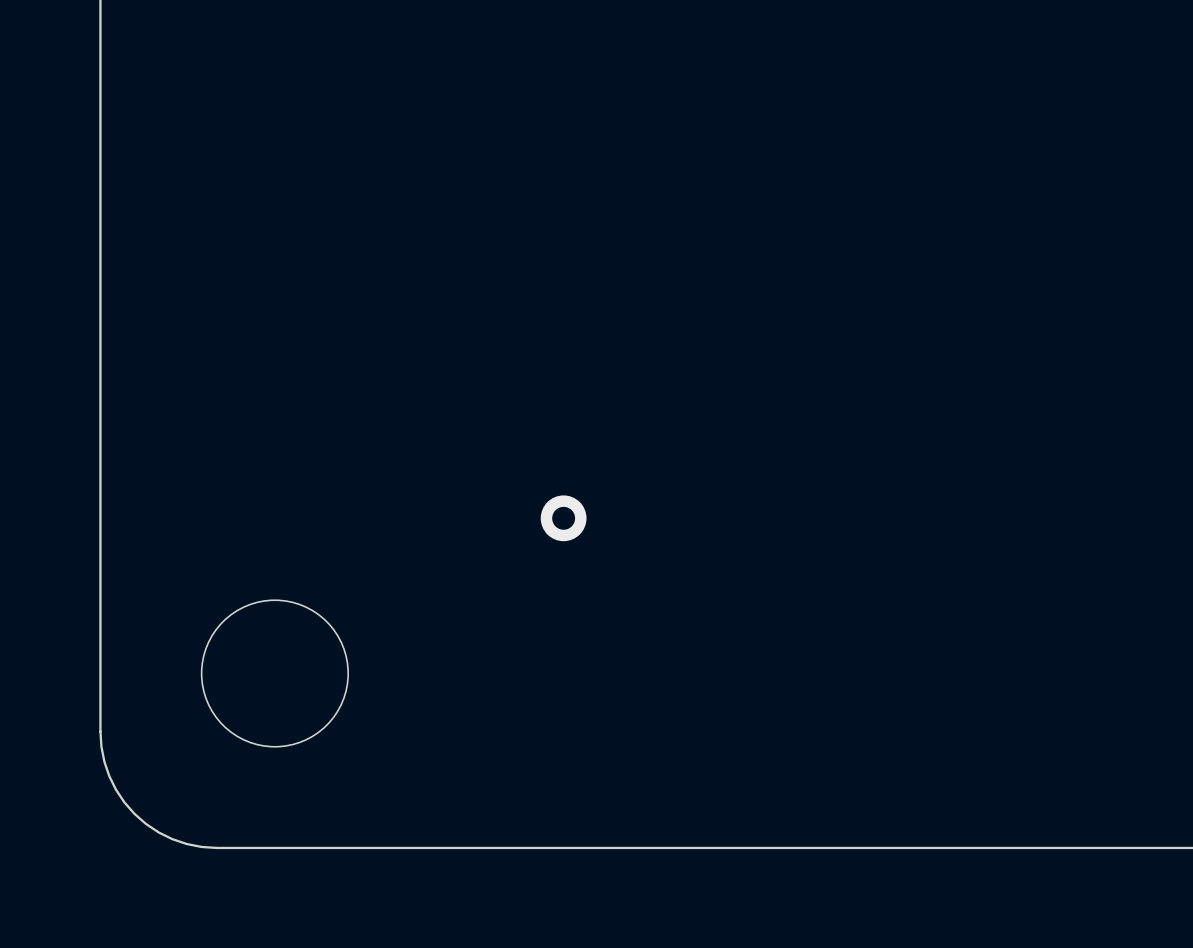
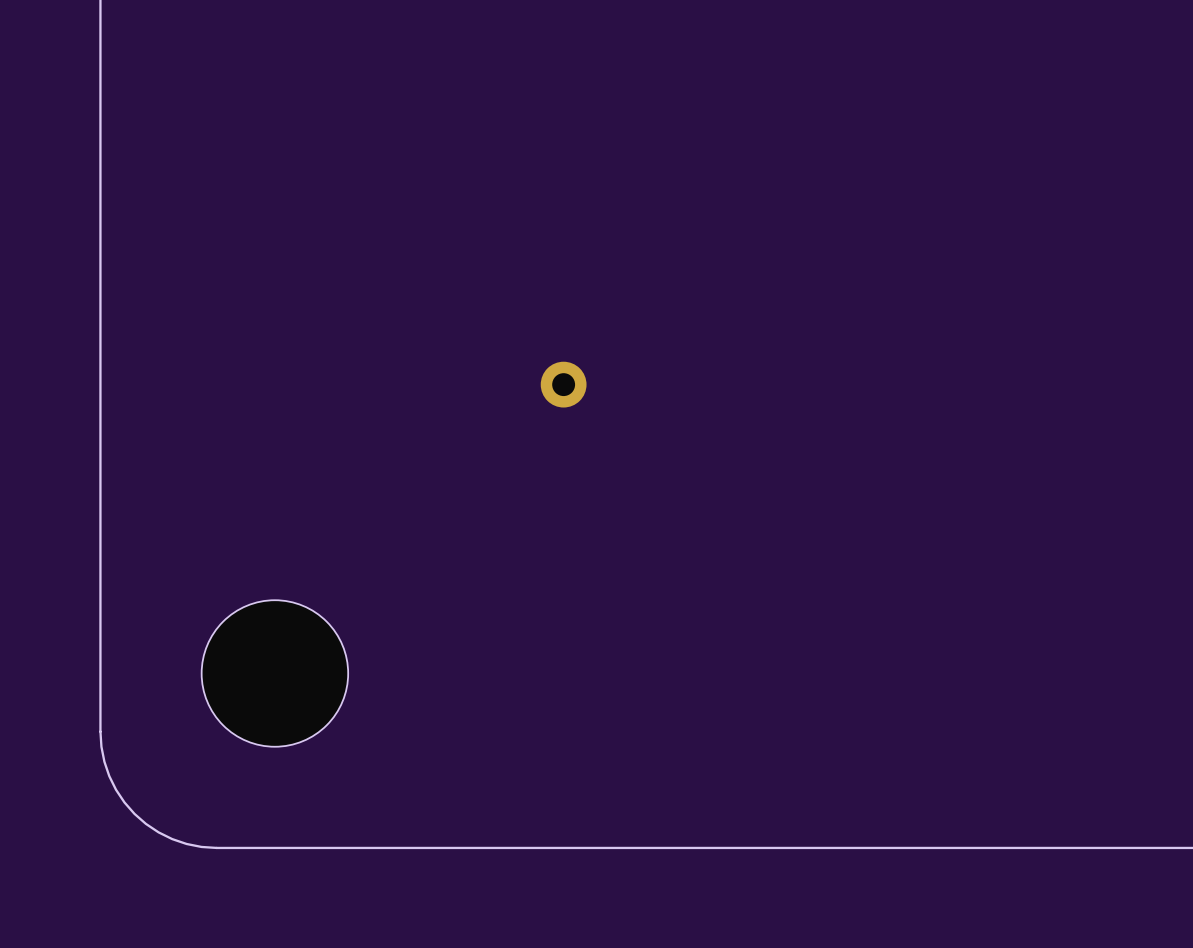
via position: (563, 518) -> (563, 384)

